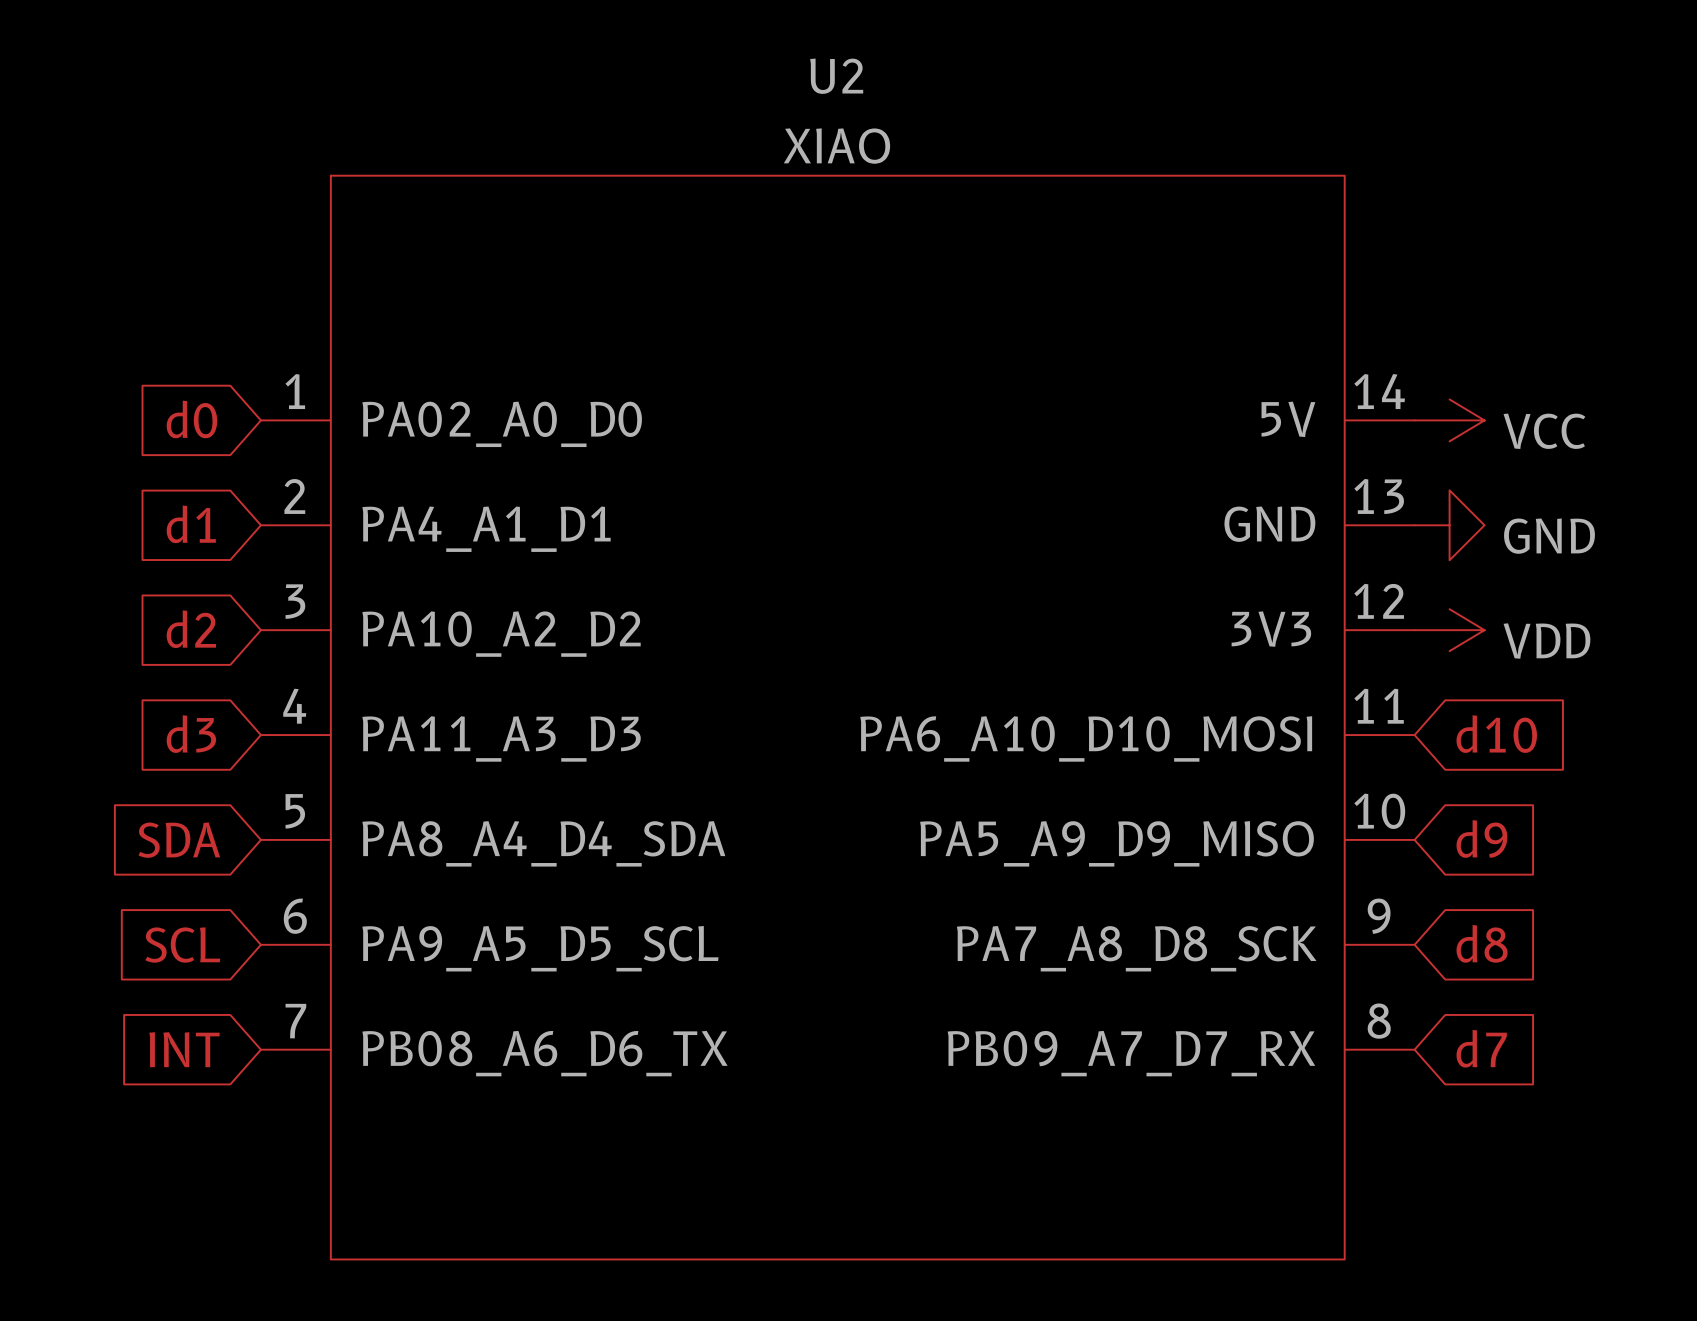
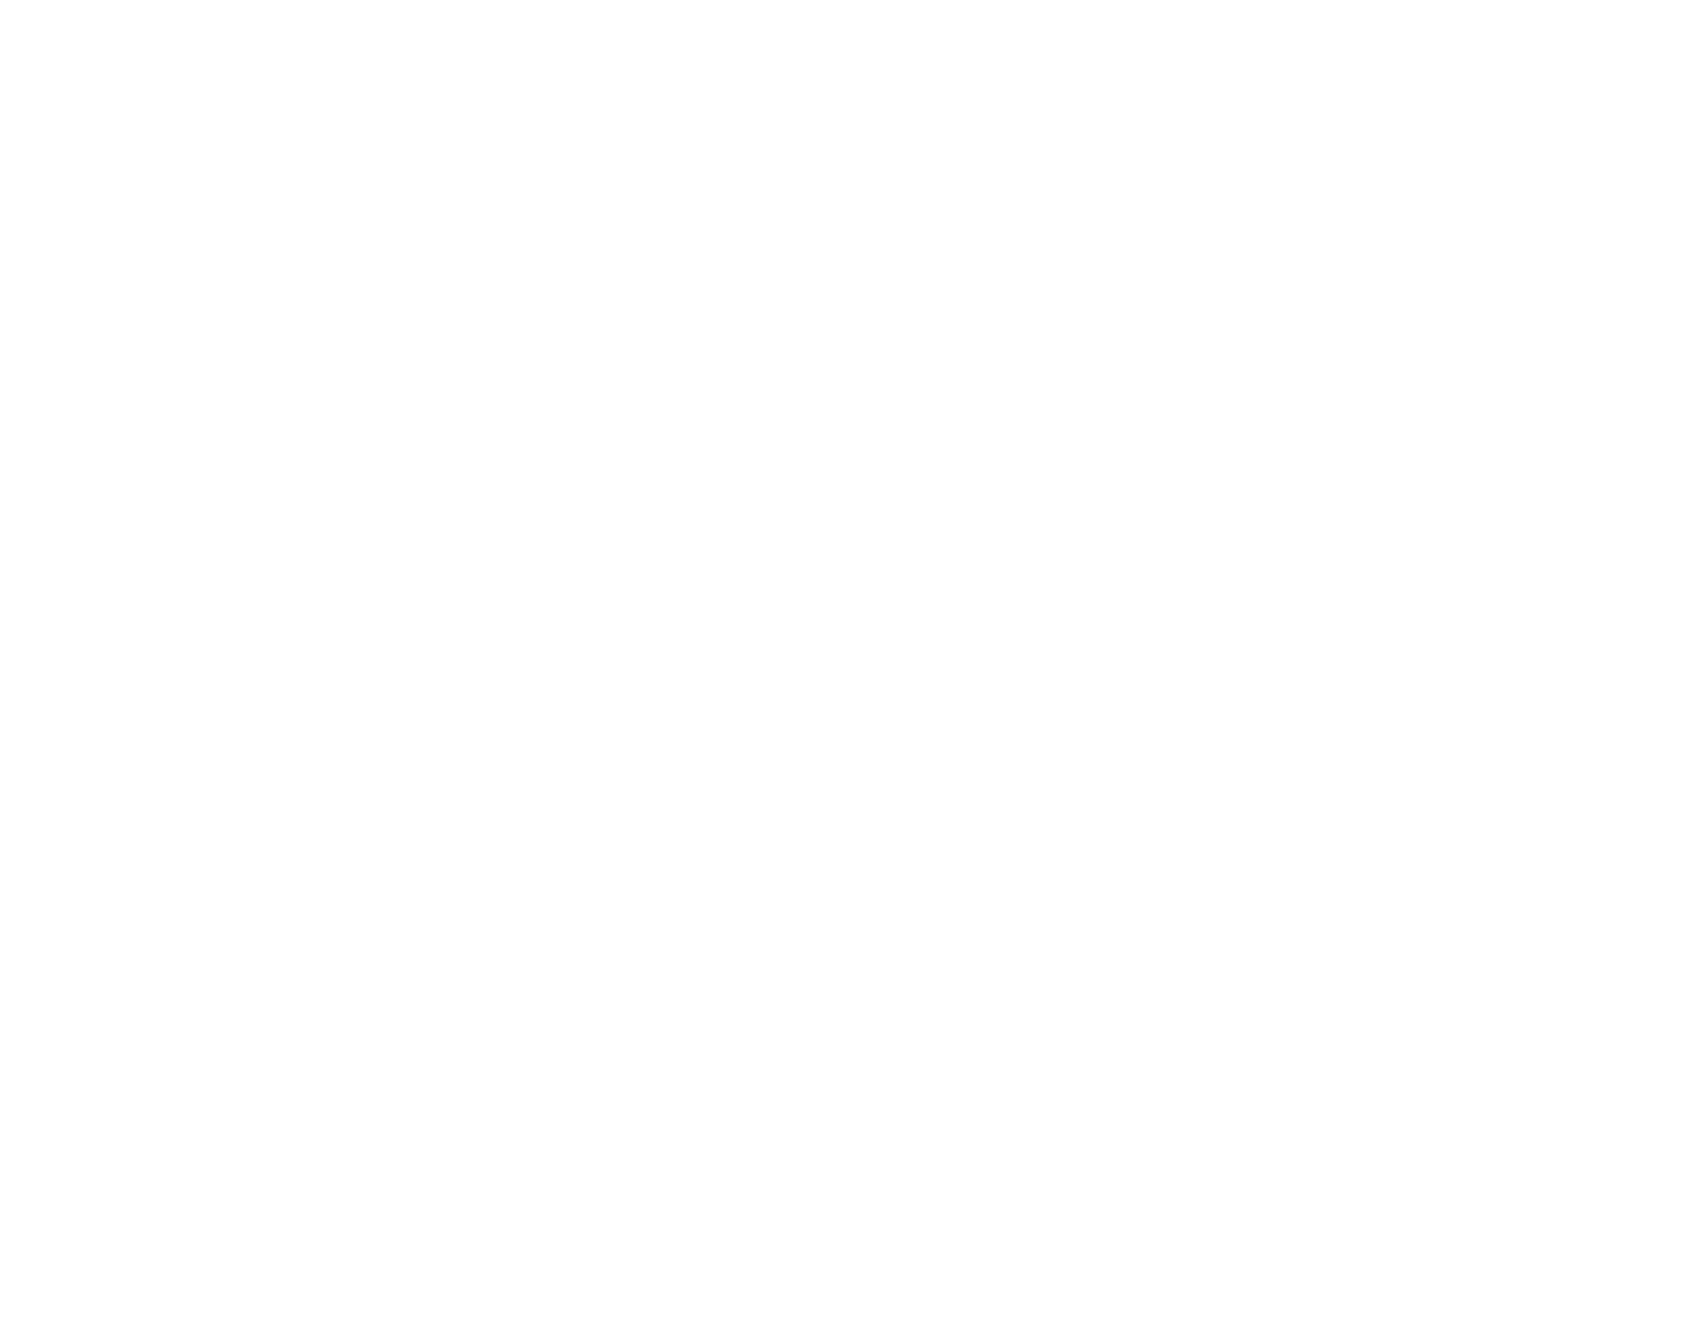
global label: d0 (191, 419) -> none
power symbol: VCC (1449, 420) -> none
global label: d1 (191, 524) -> none
power symbol: GND (1449, 525) -> none
global label: d2 (191, 629) -> none
power symbol: VDD (1449, 630) -> none
U2: XIAO (837, 717) -> none
global label: d3 (191, 734) -> none
global label: d10 (1496, 734) -> none
global label: d9 (1481, 838) -> none
global label: SDA (179, 840) -> none
global label: d8 (1482, 943) -> none
global label: SCL (182, 945) -> none
global label: d7 (1481, 1048) -> none
global label: INT (184, 1049) -> none

